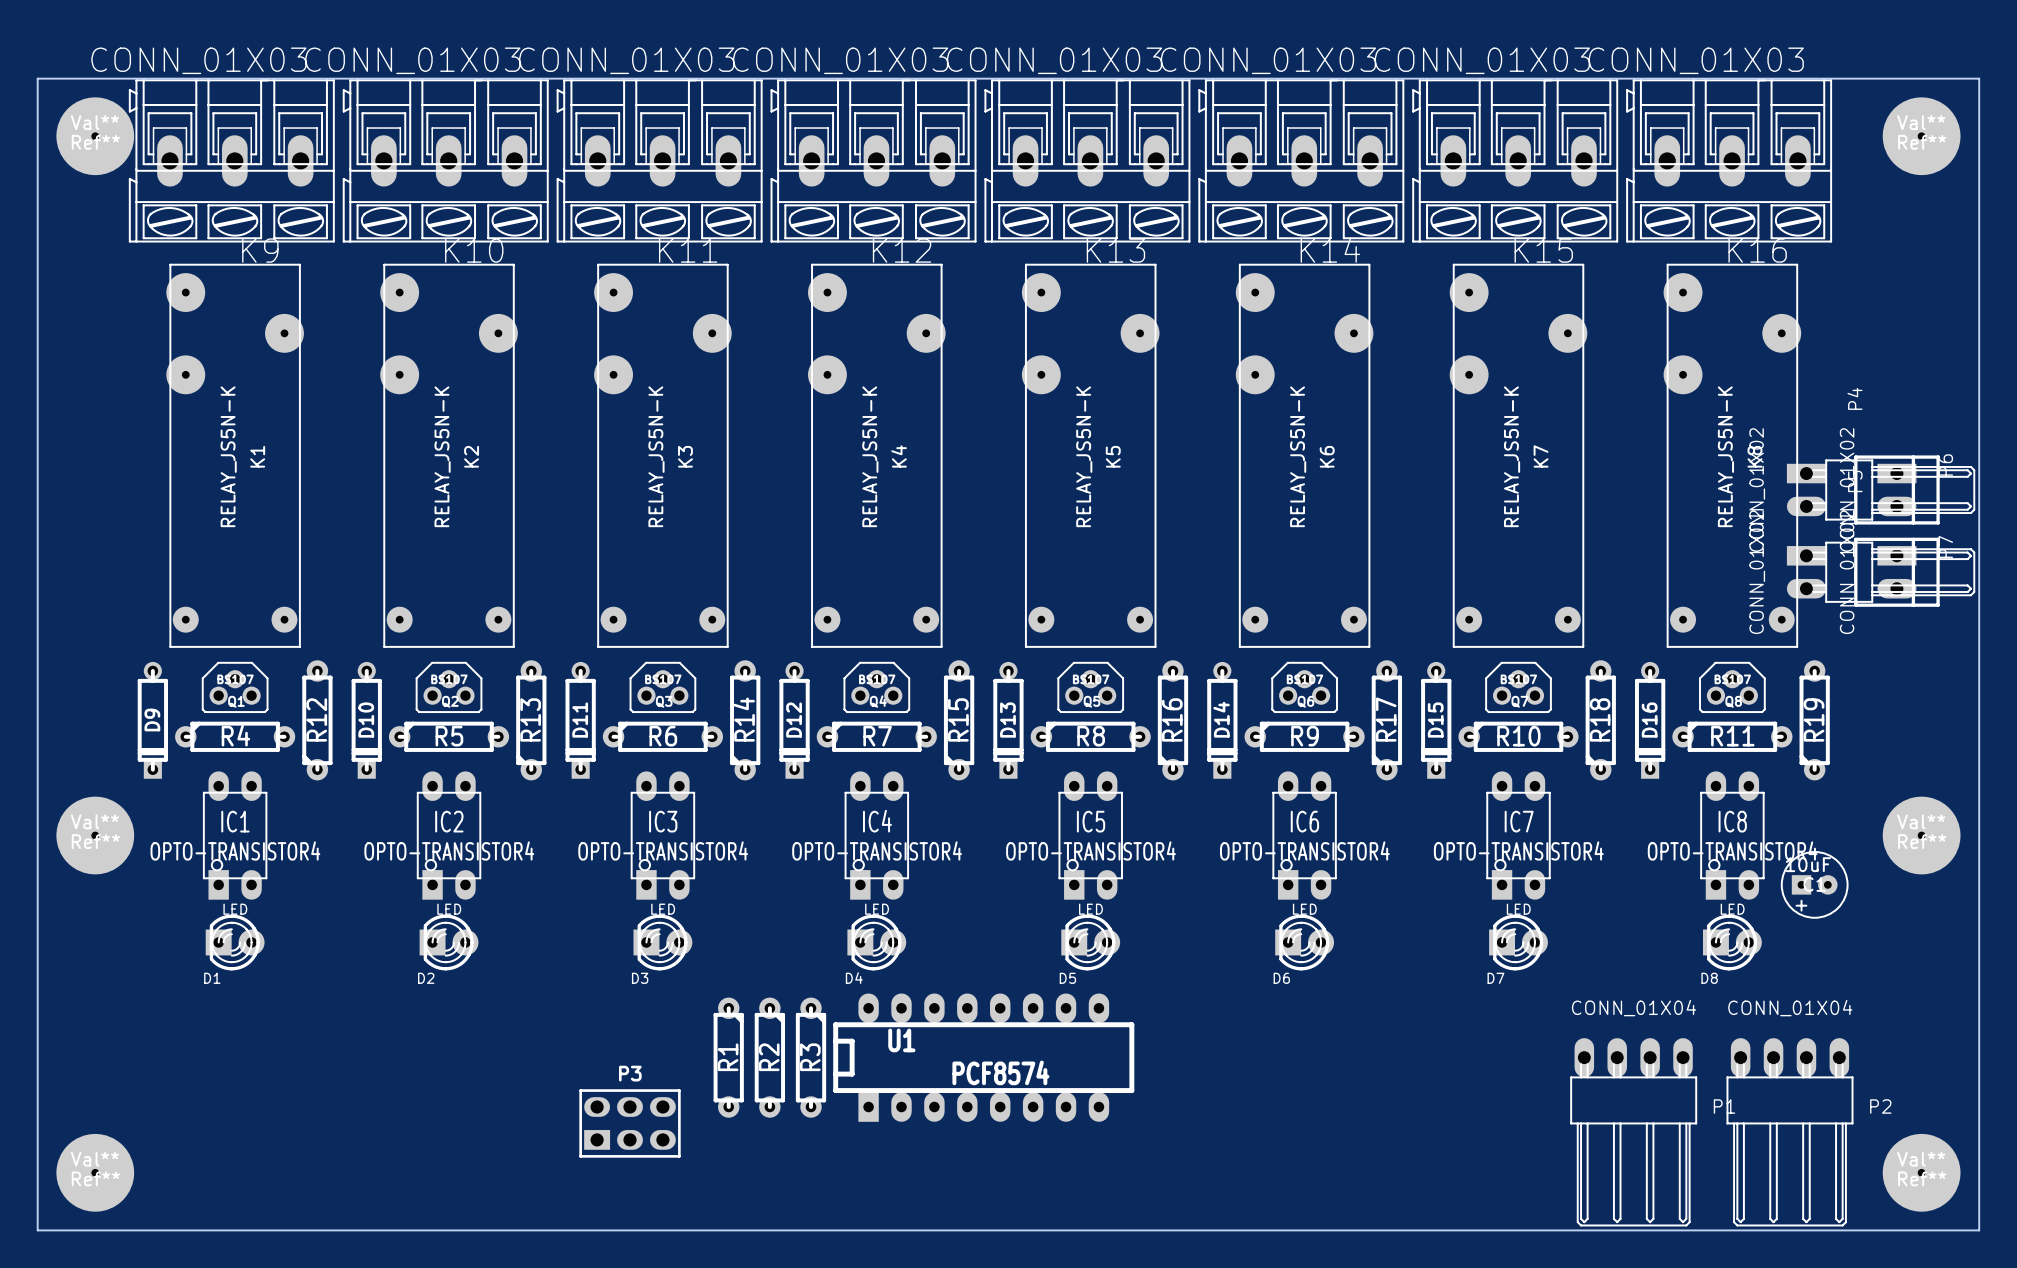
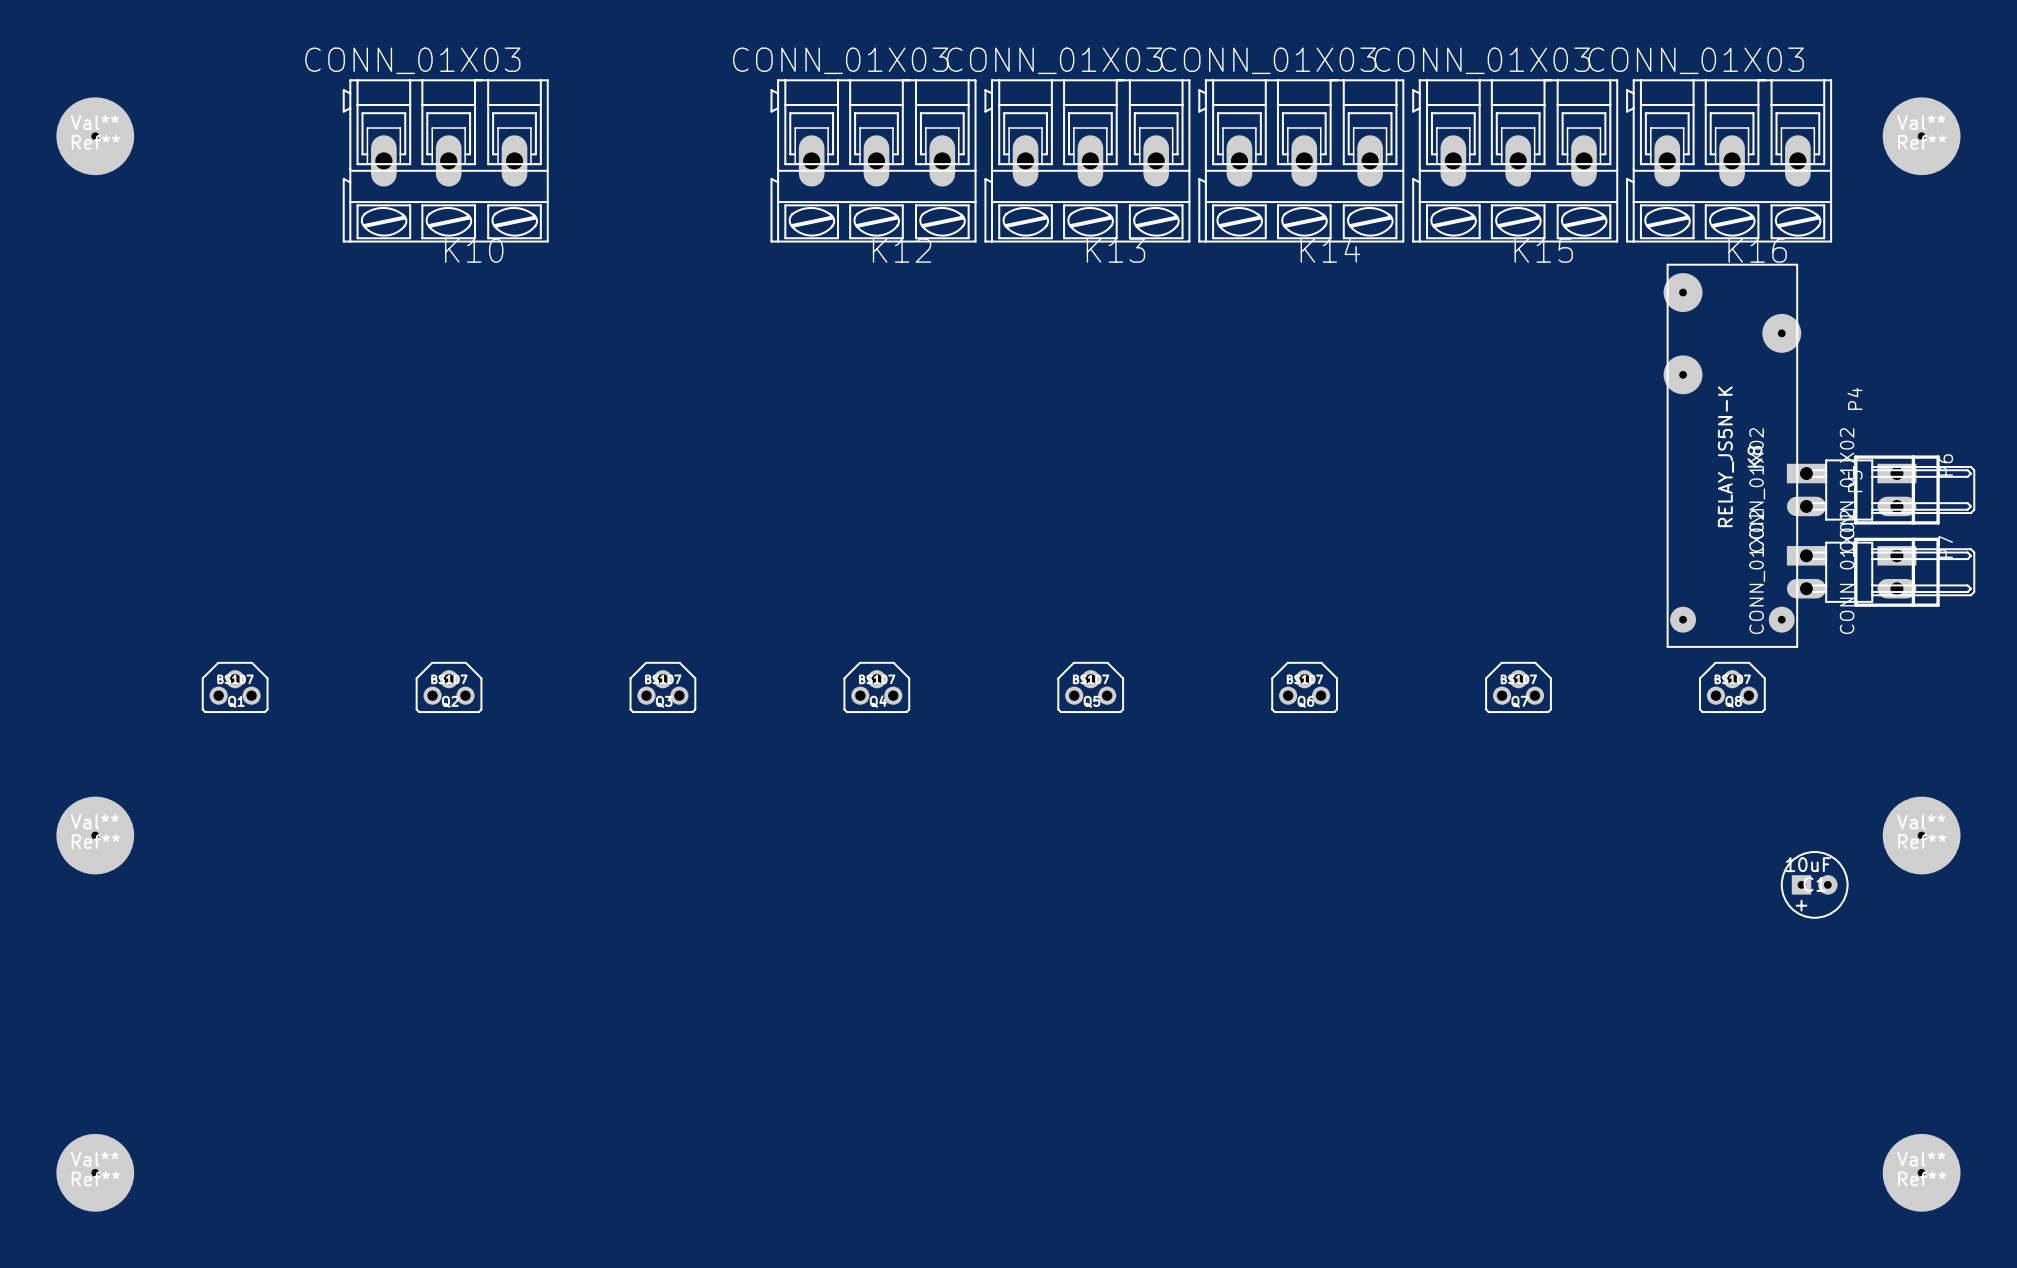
board edge: (37, 78) (1979, 78) (1979, 1230) (37, 1230) (37, 78) -> none
K9: CONN_01X03 (231, 160) -> none
K11: CONN_01X03 (659, 160) -> none
K1: RELAY_JS5N-K (235, 455) -> none
K2: RELAY_JS5N-K (449, 455) -> none
K3: RELAY_JS5N-K (662, 455) -> none
K4: RELAY_JS5N-K (876, 455) -> none
K5: RELAY_JS5N-K (1090, 455) -> none
K6: RELAY_JS5N-K (1304, 455) -> none
K7: RELAY_JS5N-K (1518, 455) -> none
D9: (152, 720) -> none
R12: (317, 720) -> none
D10: (366, 720) -> none
R13: (531, 720) -> none
D11: (580, 720) -> none
R14: (745, 720) -> none
D12: (794, 720) -> none
R15: (959, 720) -> none
D13: (1008, 720) -> none
R16: (1172, 720) -> none
D14: (1222, 720) -> none
R17: (1386, 720) -> none
D15: (1436, 720) -> none
R18: (1600, 720) -> none
D16: (1650, 720) -> none
R19: (1814, 720) -> none
R4: (235, 736) -> none
R5: (449, 736) -> none
R6: (662, 736) -> none
R7: (876, 736) -> none
R8: (1090, 736) -> none
R9: (1304, 736) -> none
R10: (1518, 736) -> none
R11: (1732, 736) -> none
IC1: OPTO-TRANSISTOR4 (235, 835) -> none
IC2: OPTO-TRANSISTOR4 (449, 835) -> none
IC3: OPTO-TRANSISTOR4 (662, 835) -> none
IC4: OPTO-TRANSISTOR4 (876, 835) -> none
IC5: OPTO-TRANSISTOR4 (1090, 835) -> none
IC6: OPTO-TRANSISTOR4 (1304, 835) -> none
IC7: OPTO-TRANSISTOR4 (1518, 835) -> none
IC8: OPTO-TRANSISTOR4 (1732, 835) -> none
D1: LED (235, 942) -> none
D2: LED (449, 942) -> none
D3: LED (662, 942) -> none
D4: LED (876, 942) -> none
D5: LED (1090, 942) -> none
D6: LED (1304, 942) -> none
D7: LED (1518, 942) -> none
D8: LED (1732, 942) -> none
R1: (728, 1057) -> none
R2: (769, 1057) -> none
R3: (811, 1057) -> none
U1: PCF8574 (983, 1057) -> none
P3: (630, 1123) -> none
P1: CONN_01X04 (1633, 1132) -> none
P2: CONN_01X04 (1789, 1132) -> none

